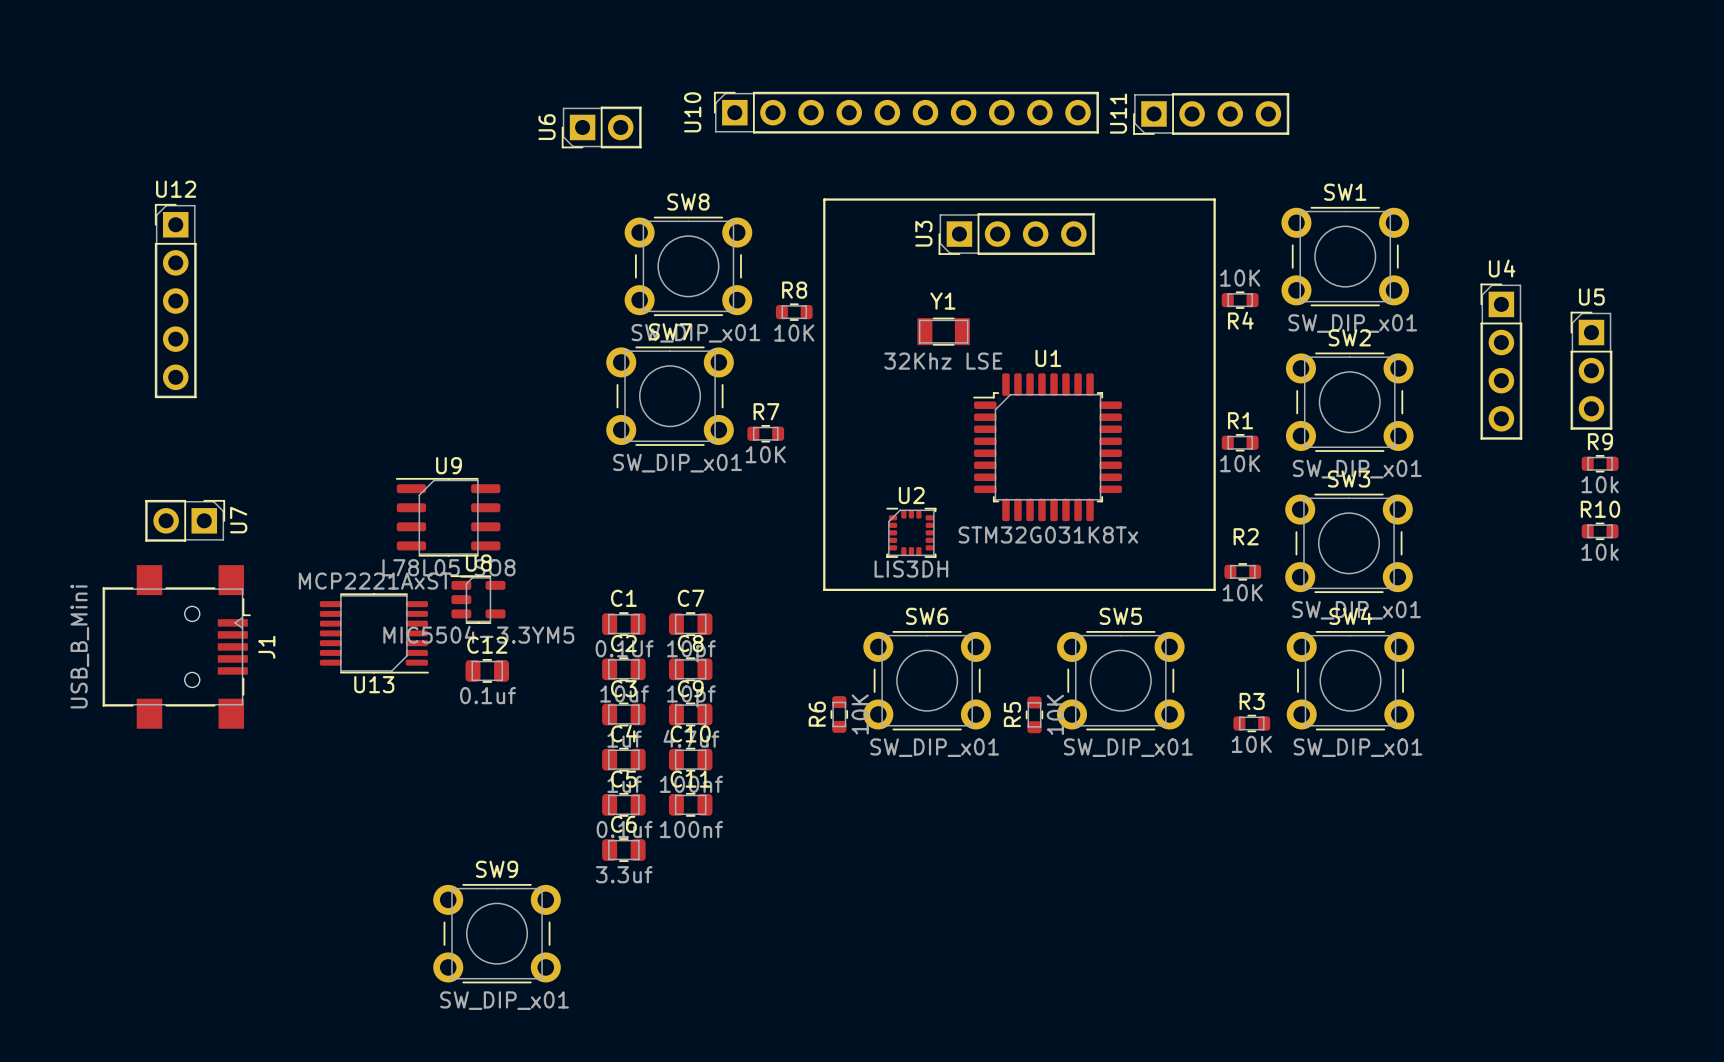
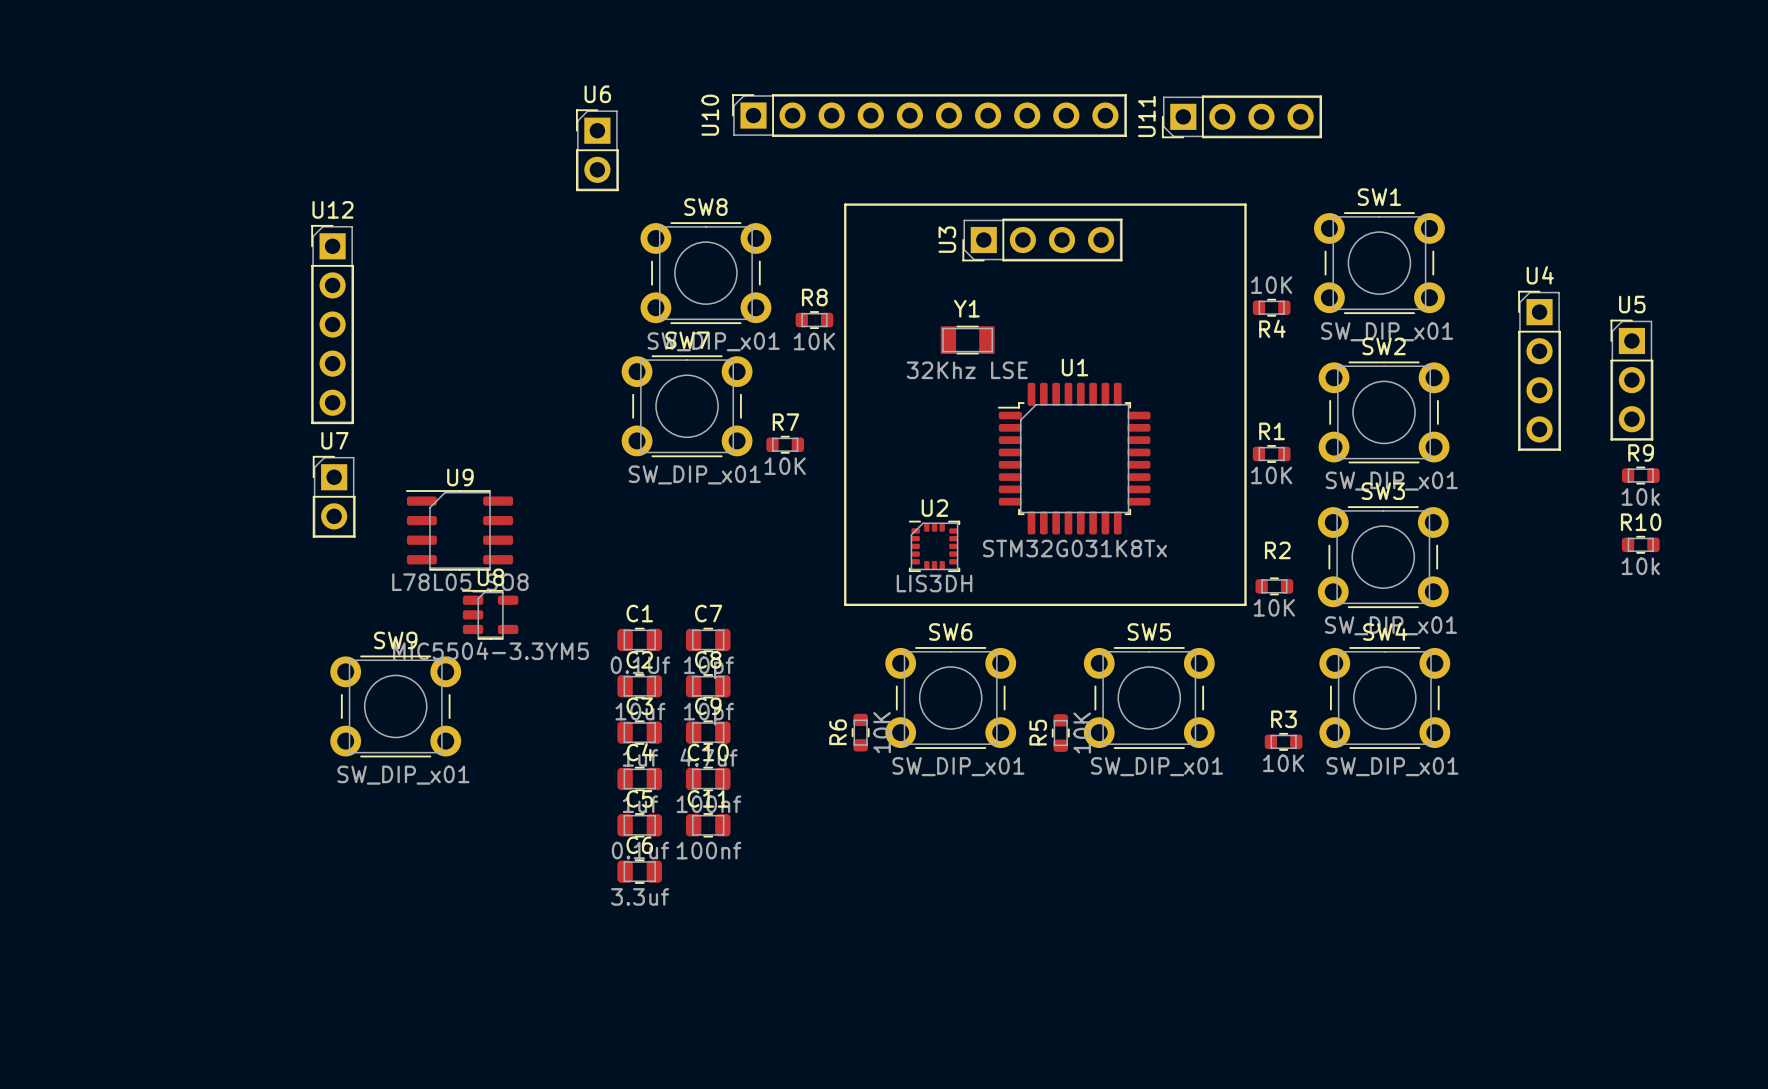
U6 rotation: 0° (601, 127) -> 90° clockwise (597, 150)
U12 position: (175, 301) -> (332, 324)
U7 rotation: 0° (185, 520) -> 90° counterclockwise (334, 496)
U7 position: (185, 520) -> (334, 496)
U13: MCP2221AxST (374, 633) -> none
J1: USB_B_Mini (176, 646) -> none
C12: 0.1uf (487, 670) -> none
SW9 position: (497, 933) -> (395, 706)

